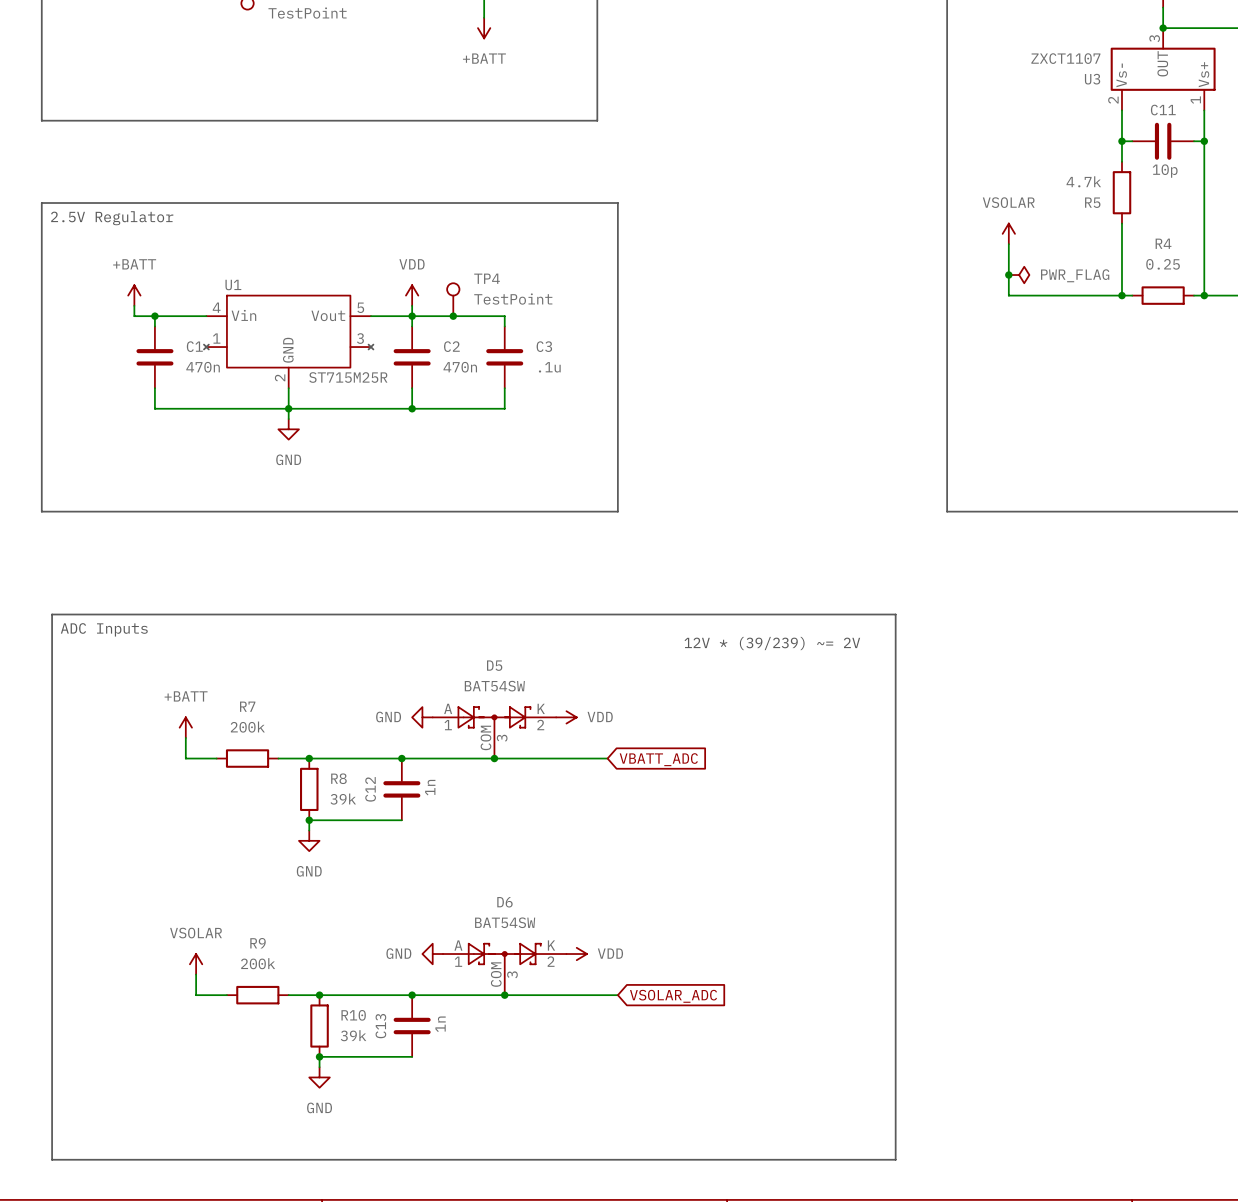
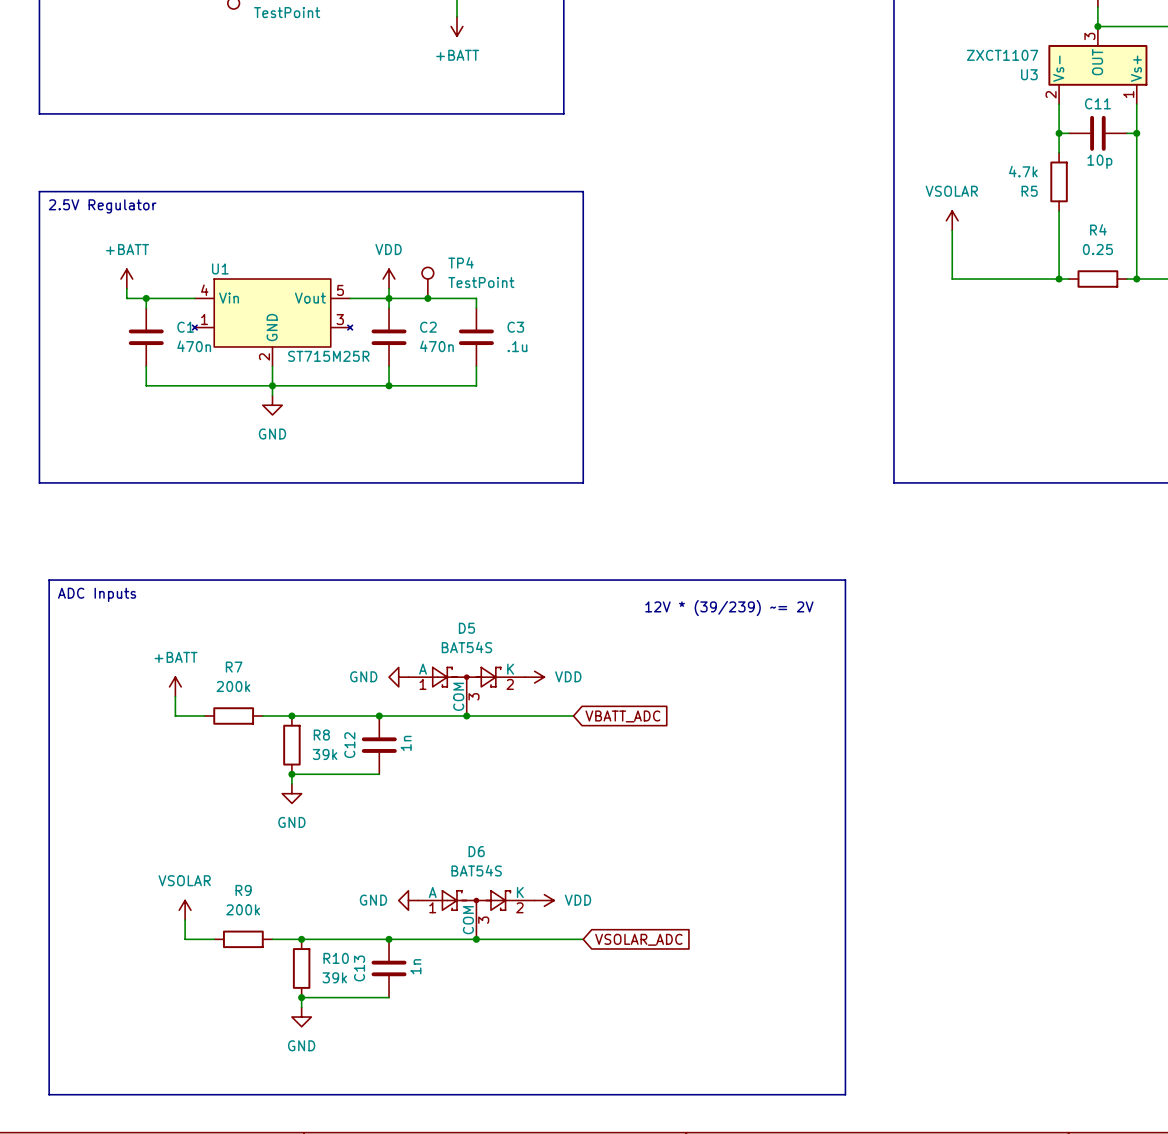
junction: (1008, 275) -> none
power symbol: PWR_FLAG (1019, 275) -> none
D5 value: BAT54SW (494, 686) -> BAT54S (466, 647)
D6 value: BAT54SW (505, 922) -> BAT54S (476, 870)

